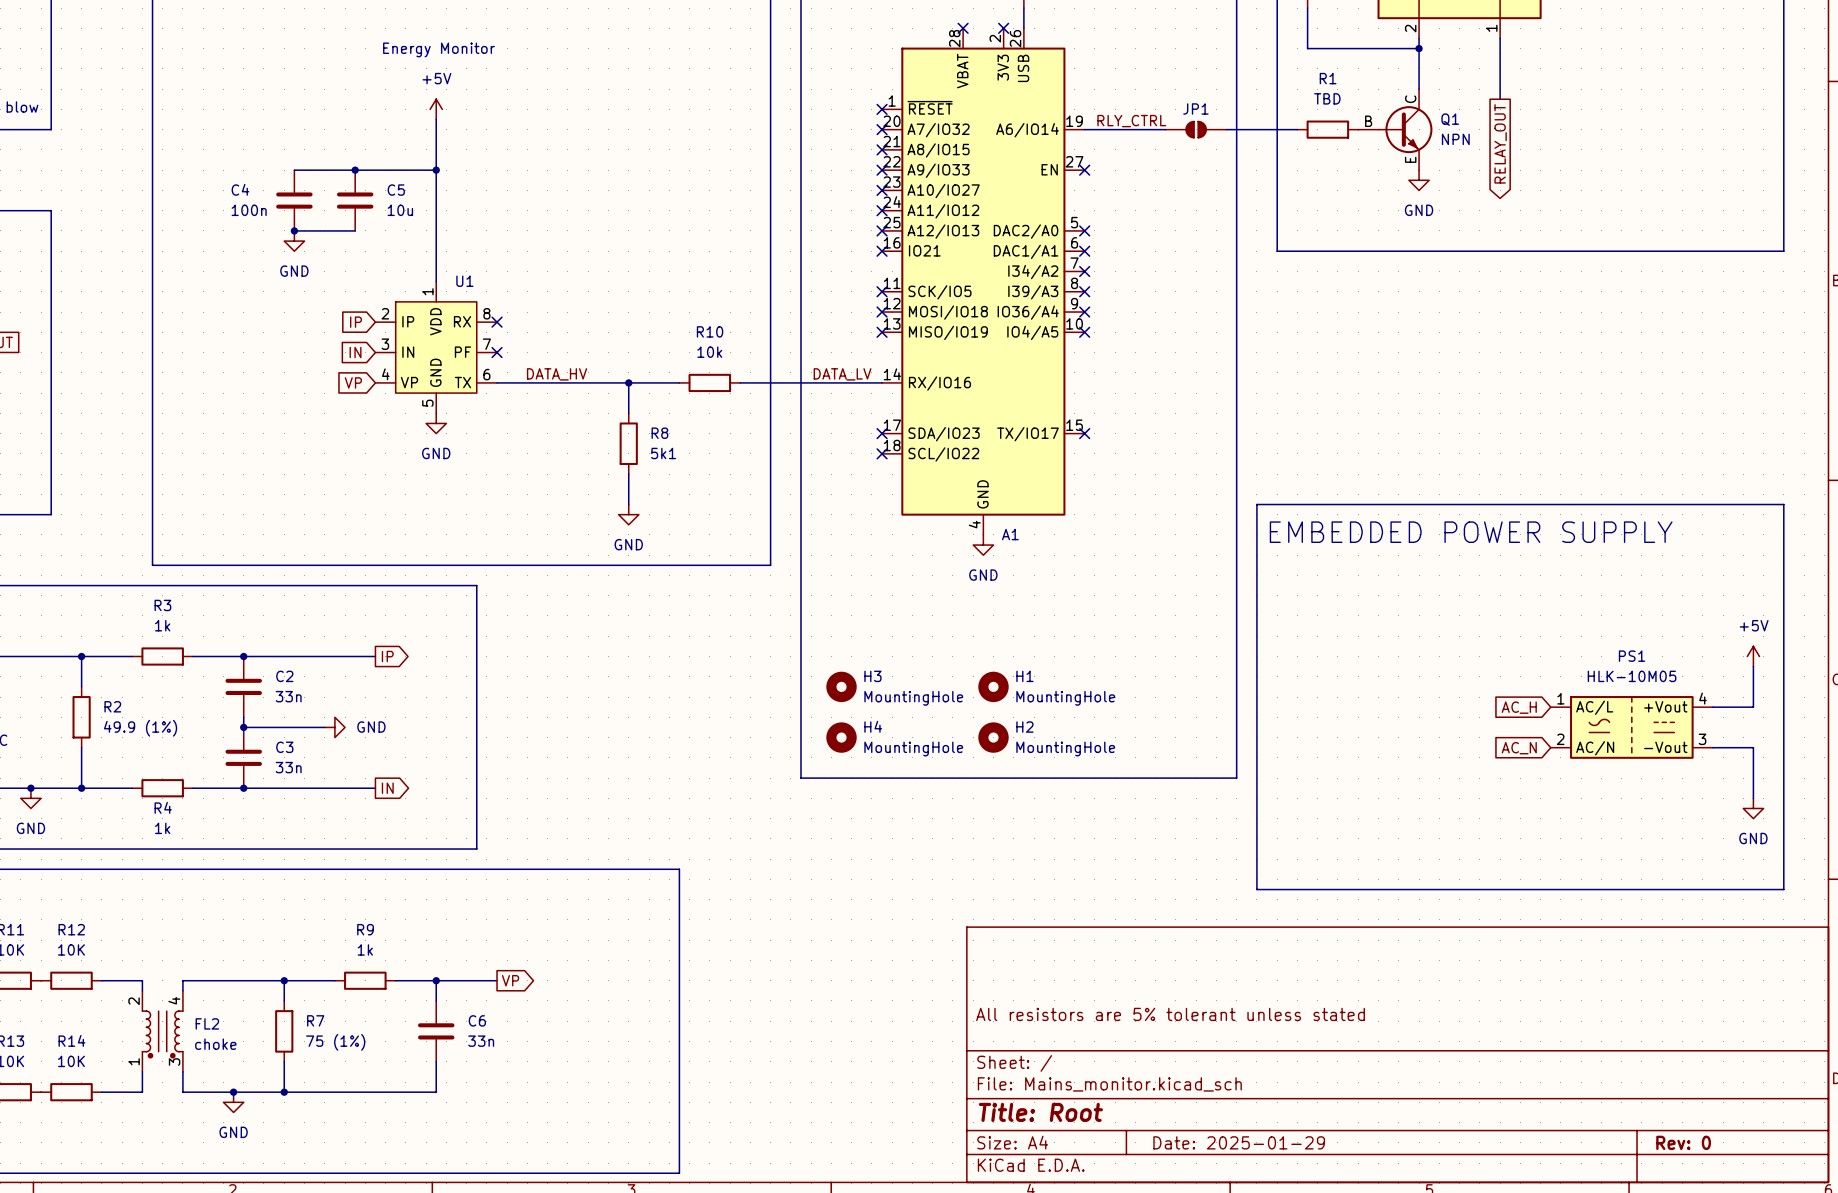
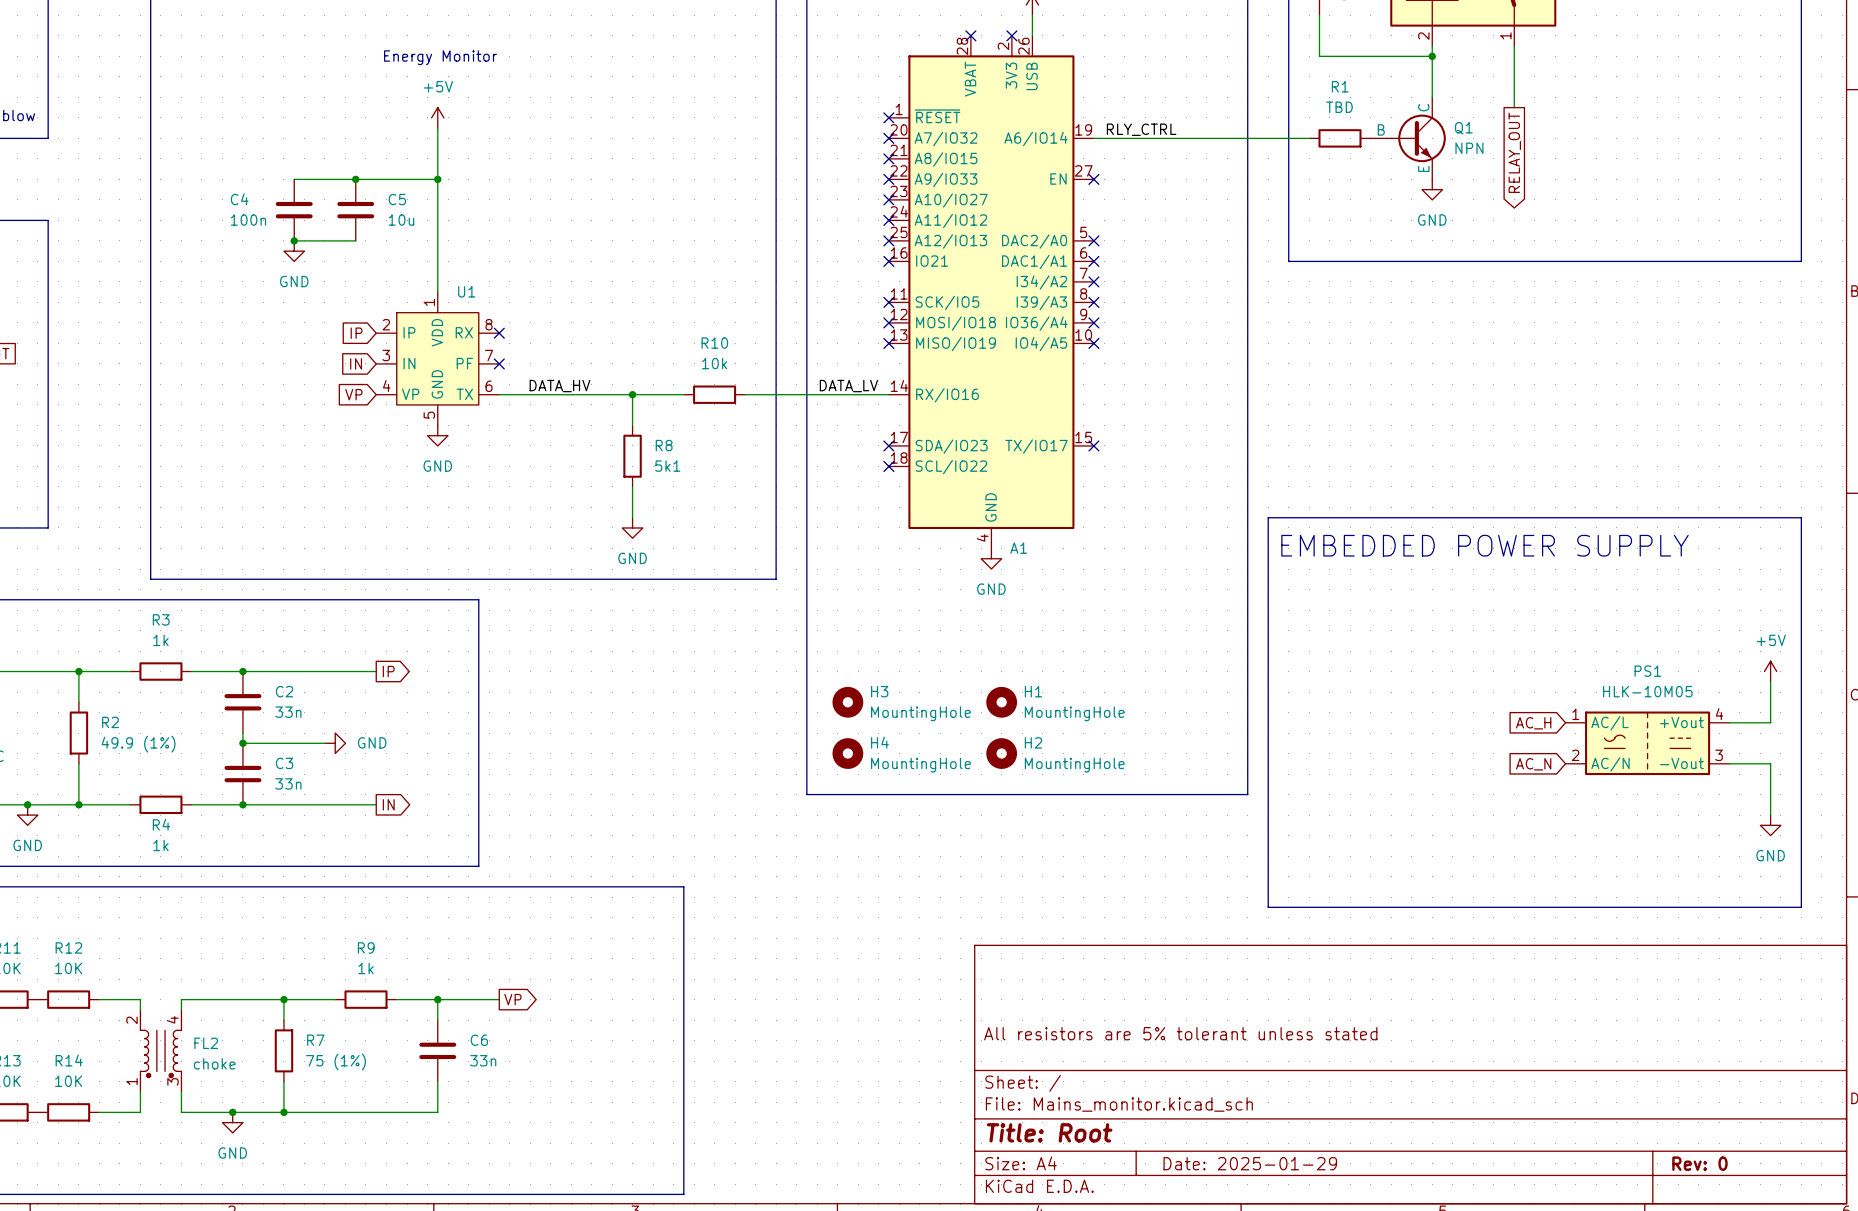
JP1: (1196, 129) -> none

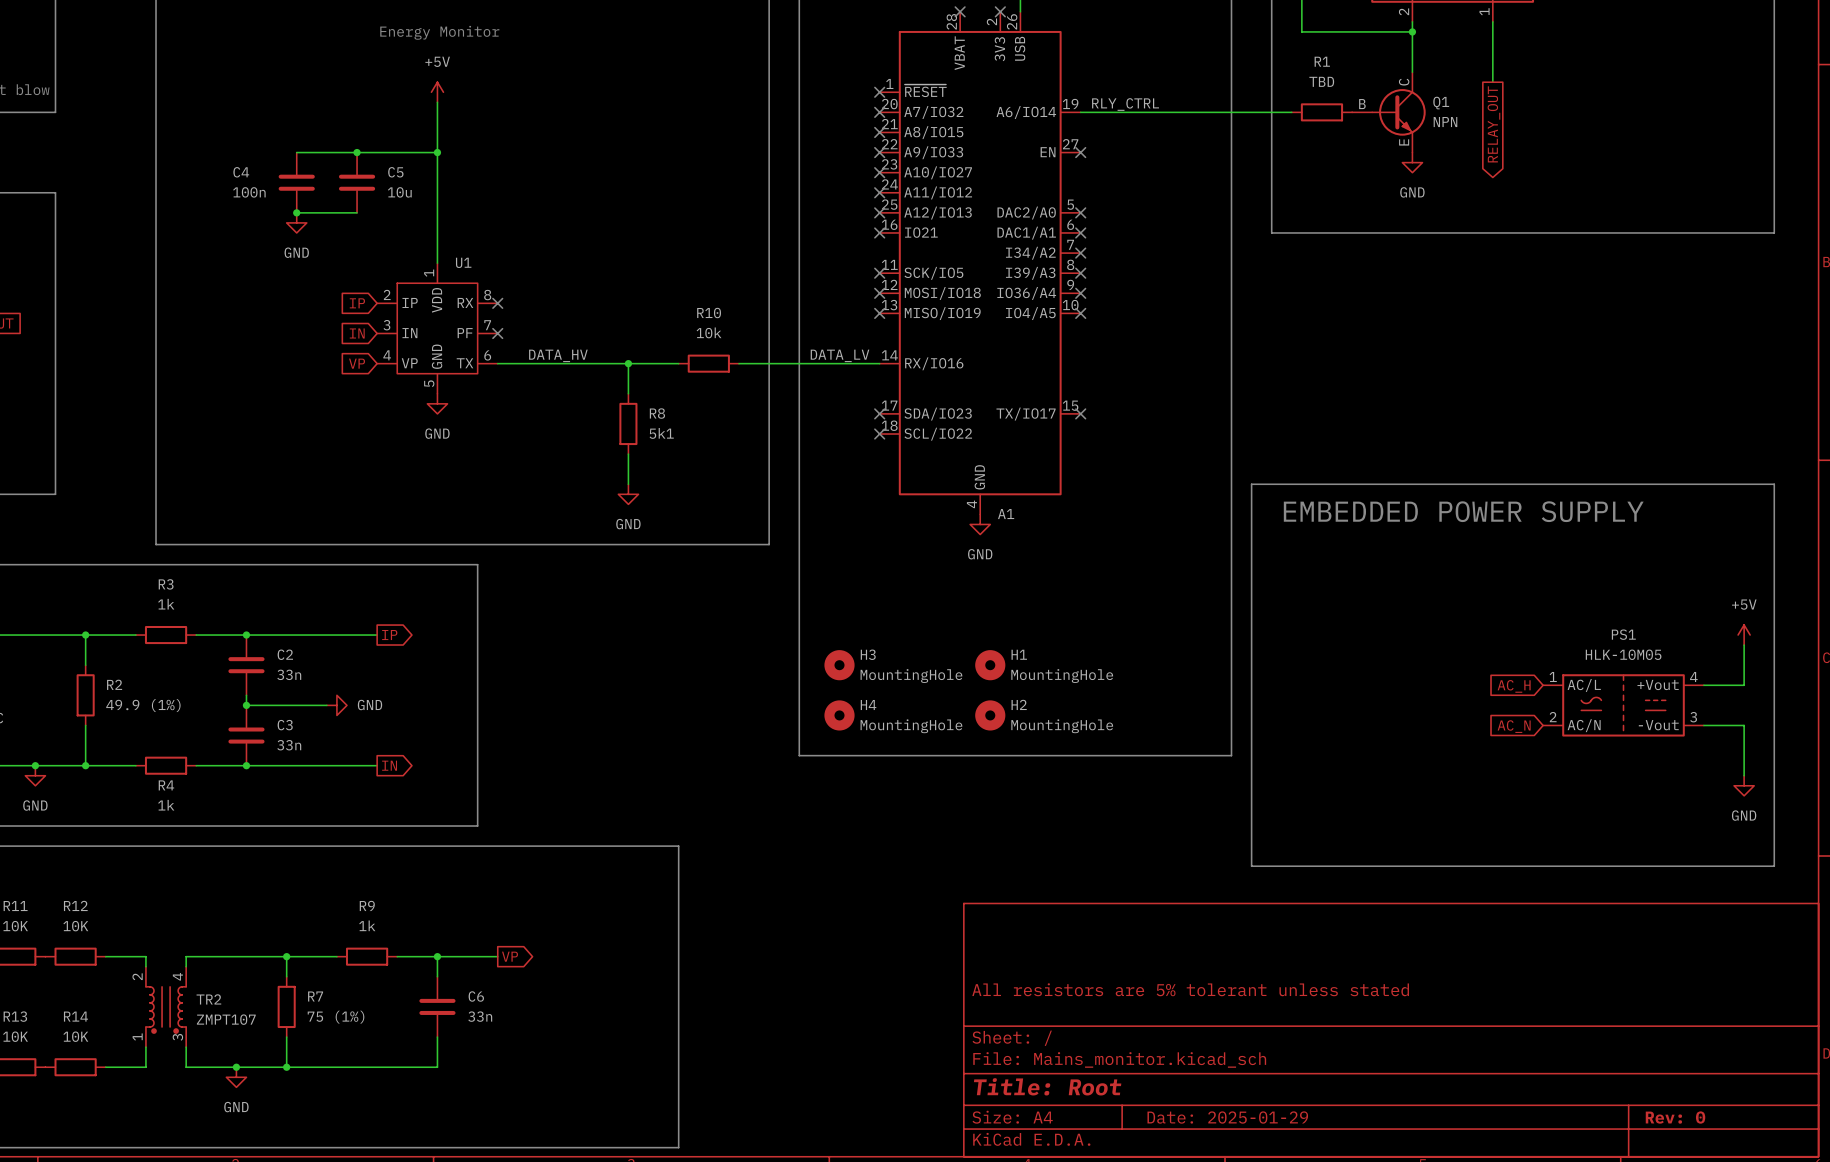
FL2 name: FL2 (206, 1043) -> TR2 (208, 999)
FL2 value: choke (214, 1063) -> ZMPT107 (226, 1019)

